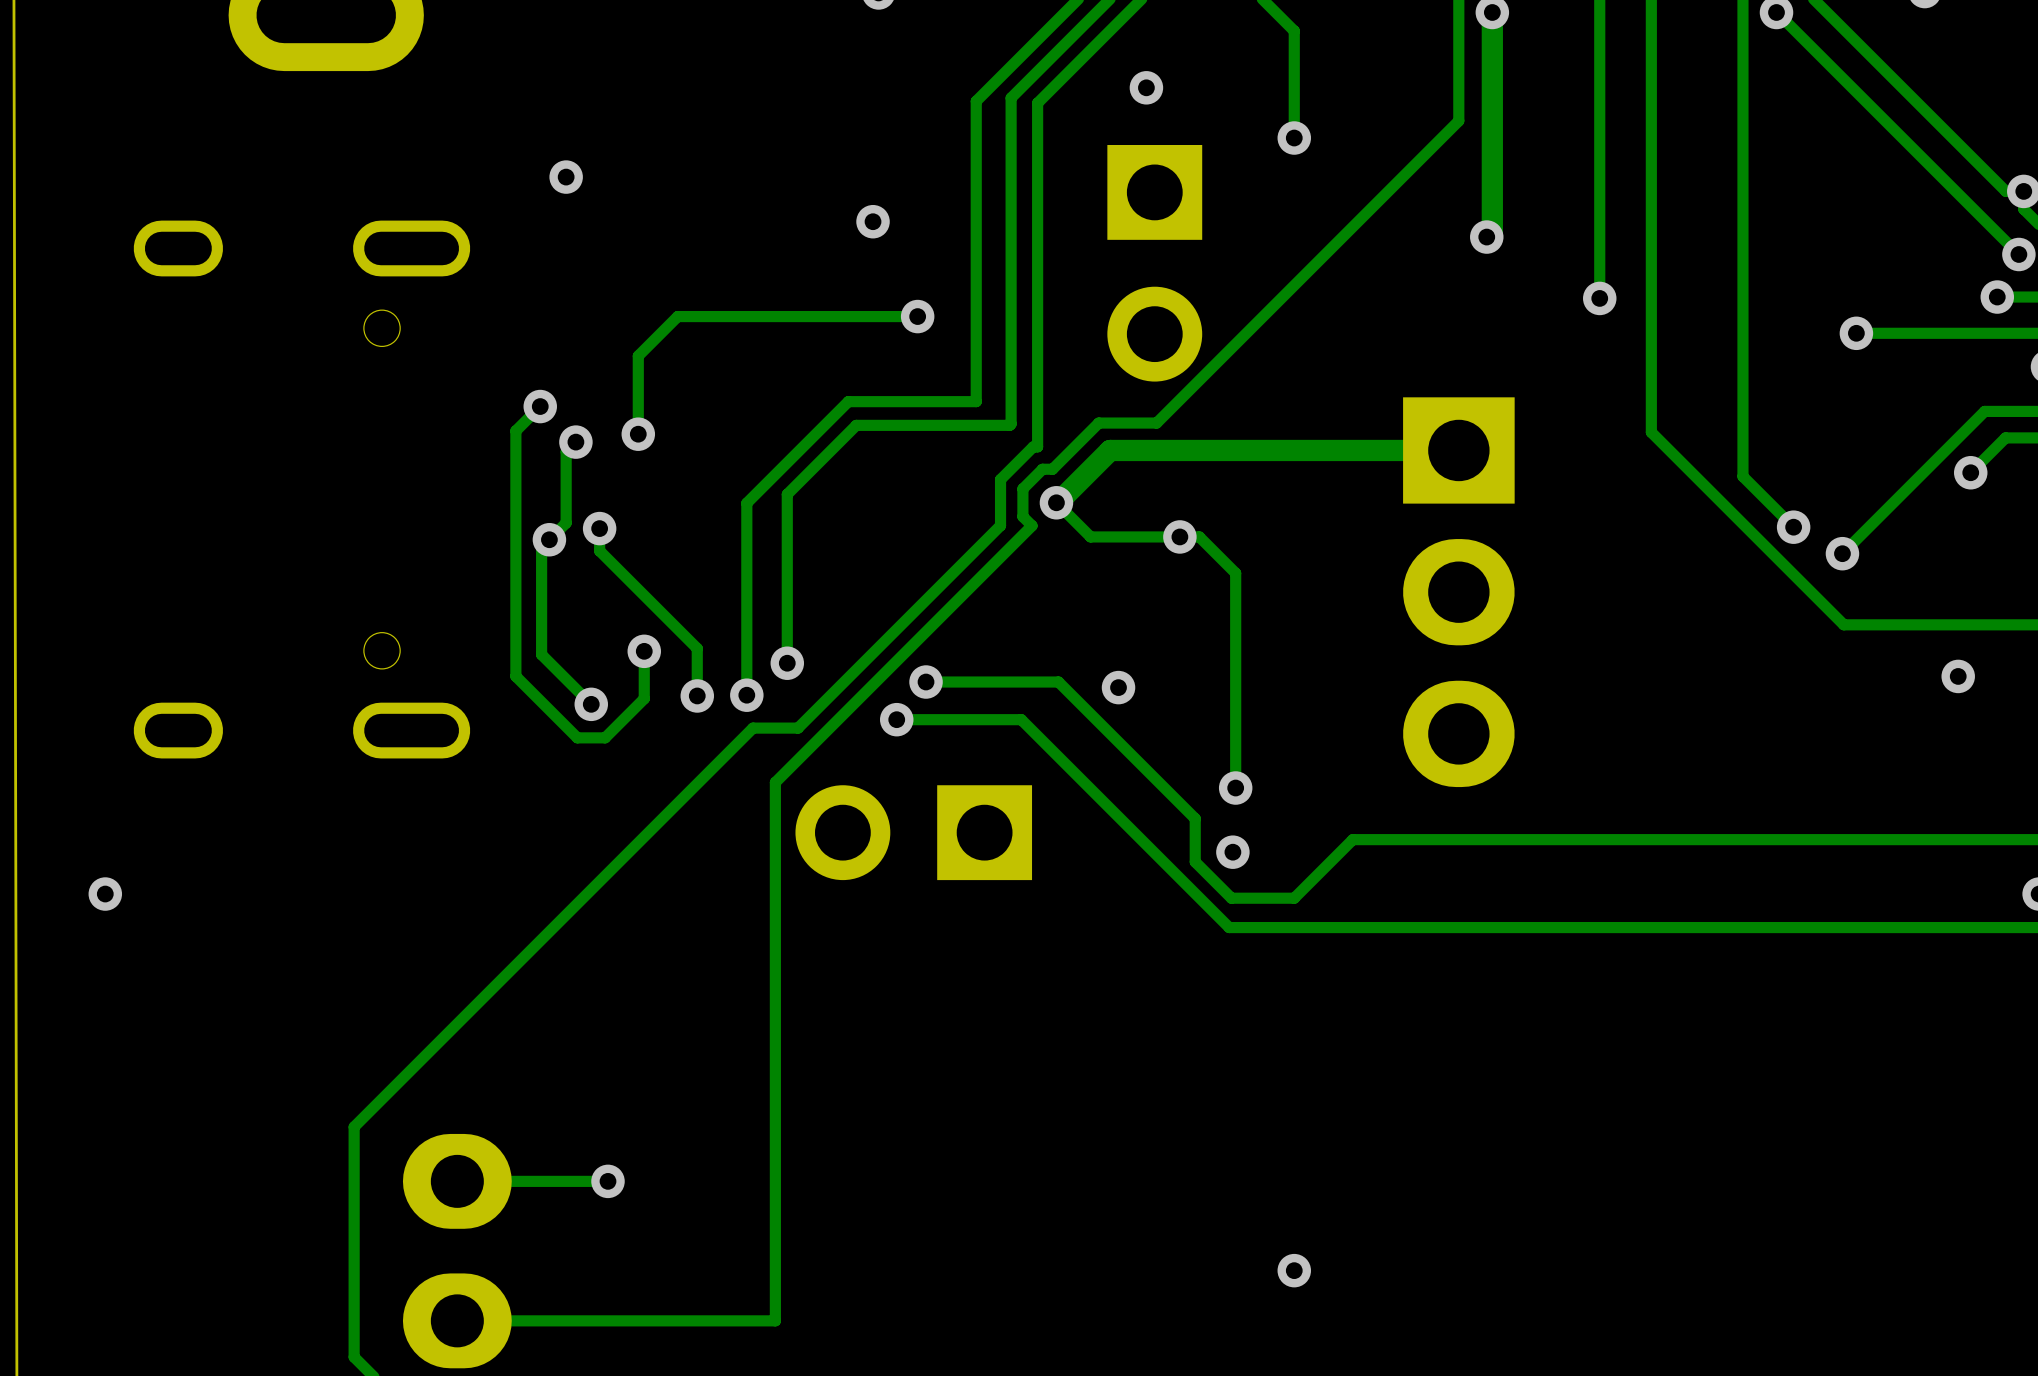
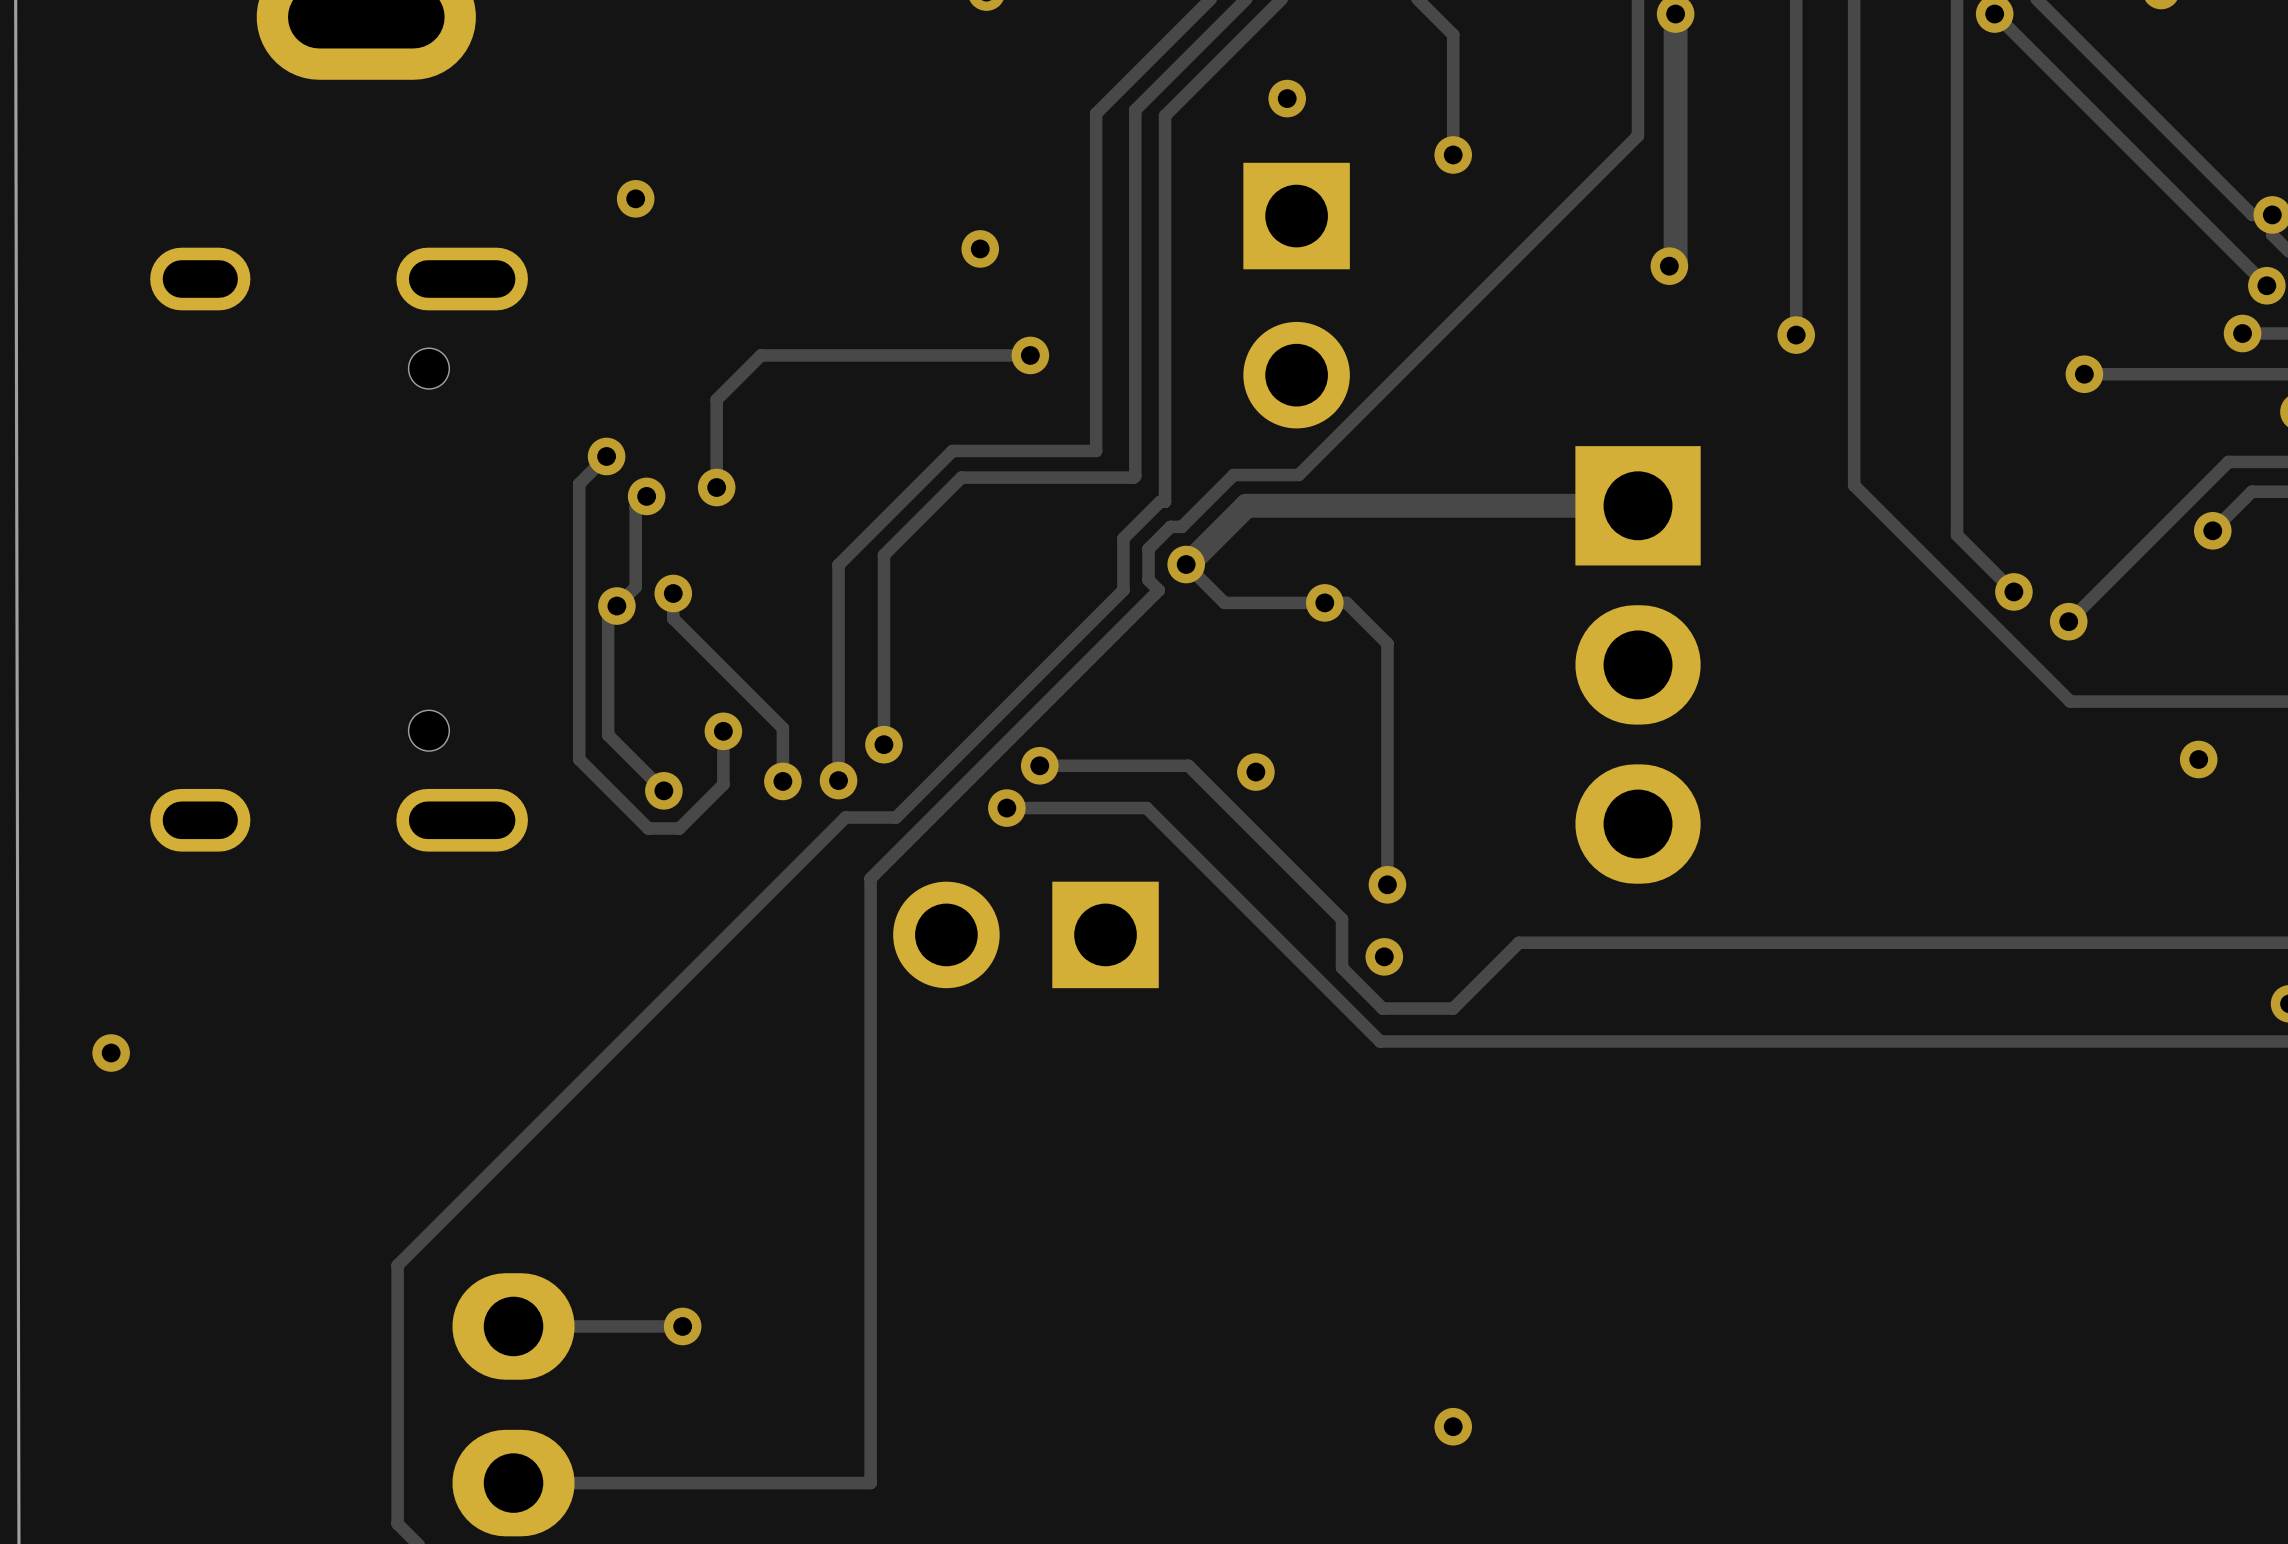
via position: (105, 894) -> (111, 1053)

